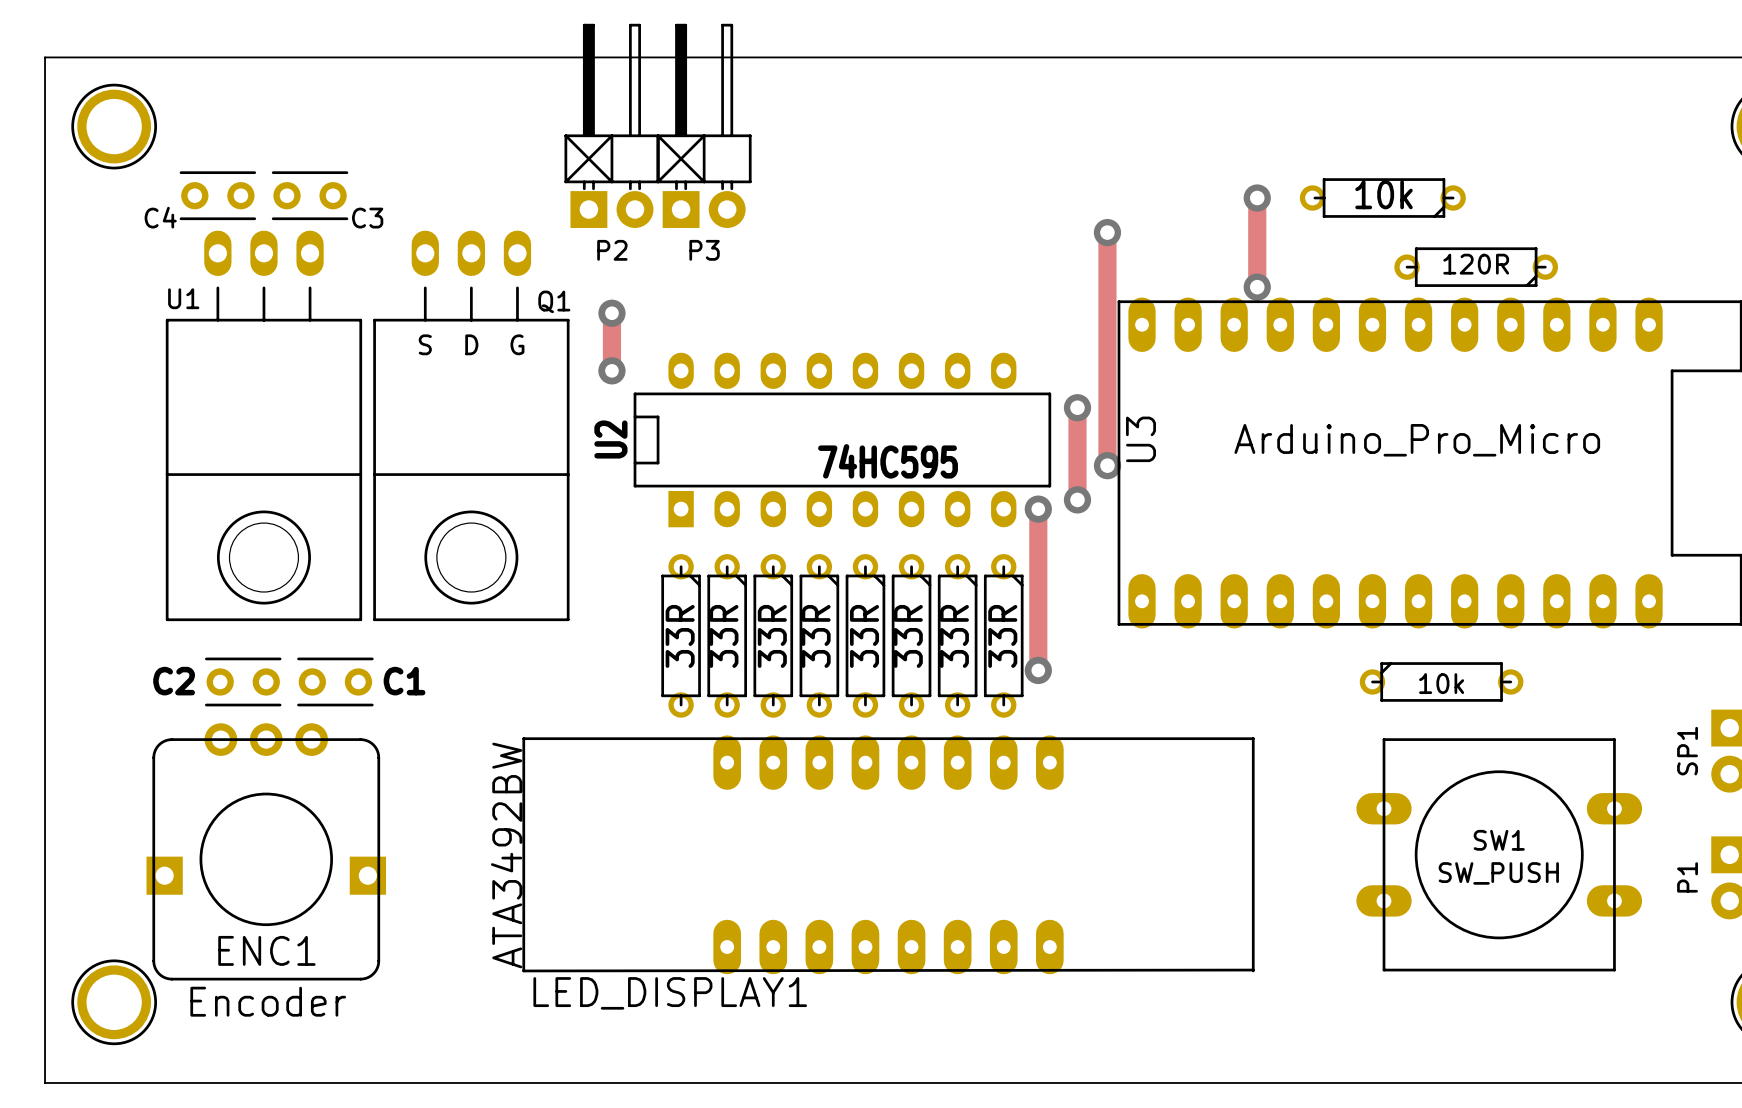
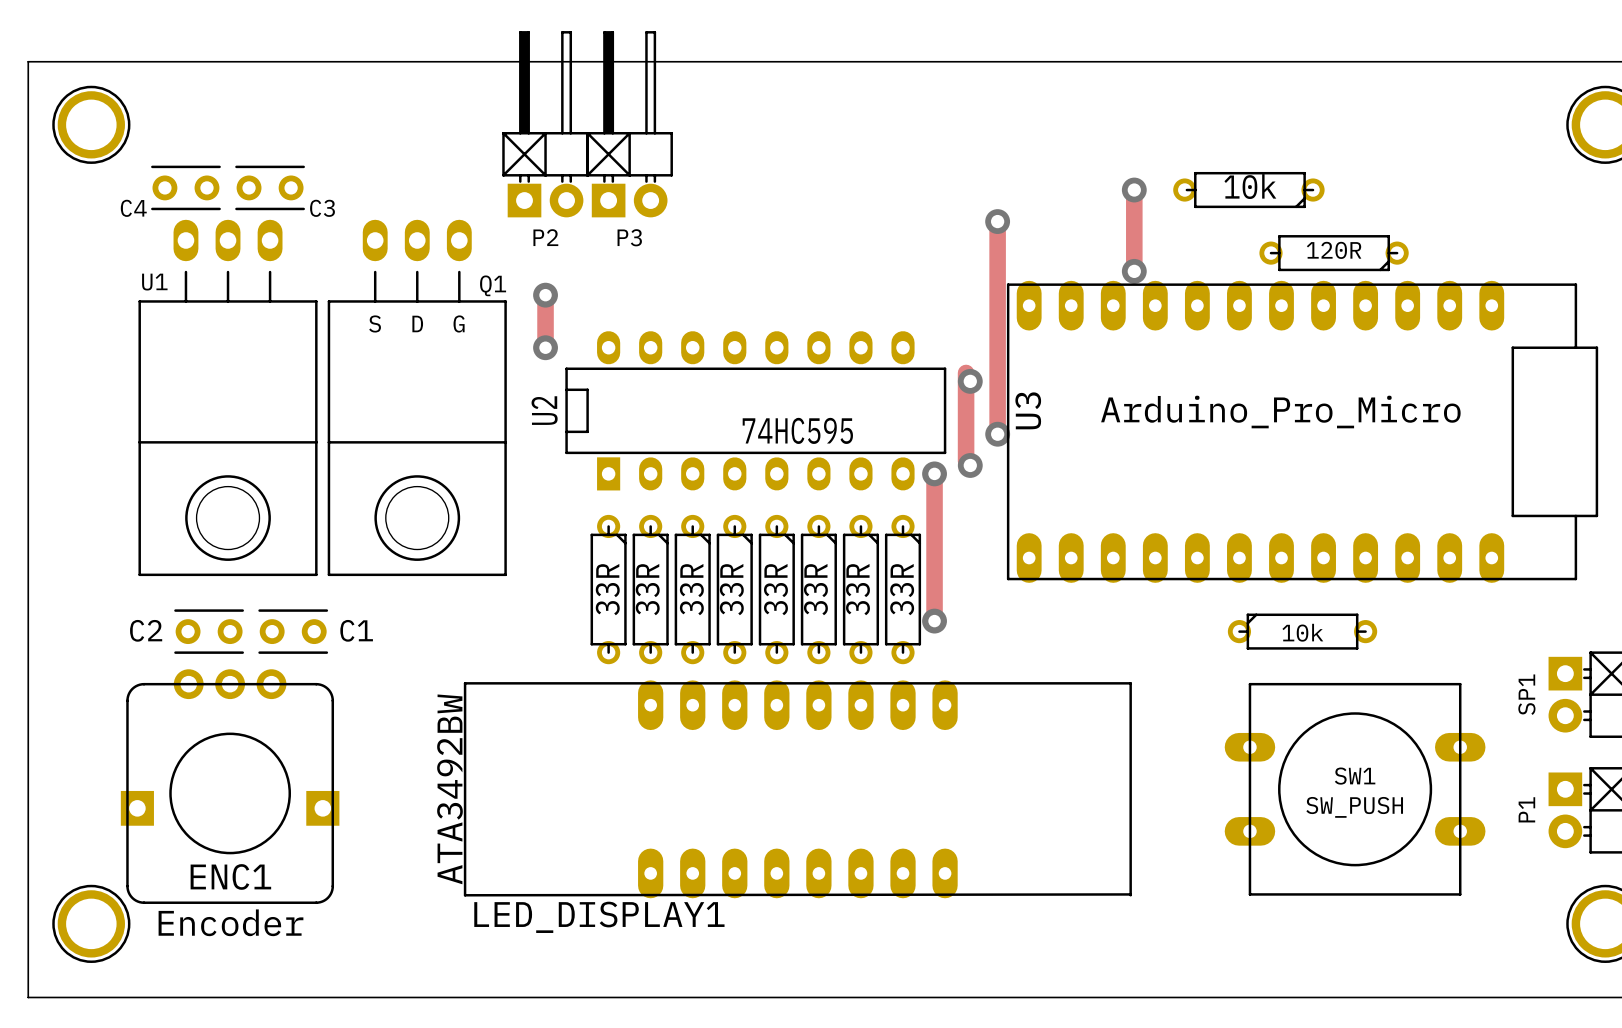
track: none -> (966, 372) (966, 461)
track: (1077, 407) (1077, 499) -> none

